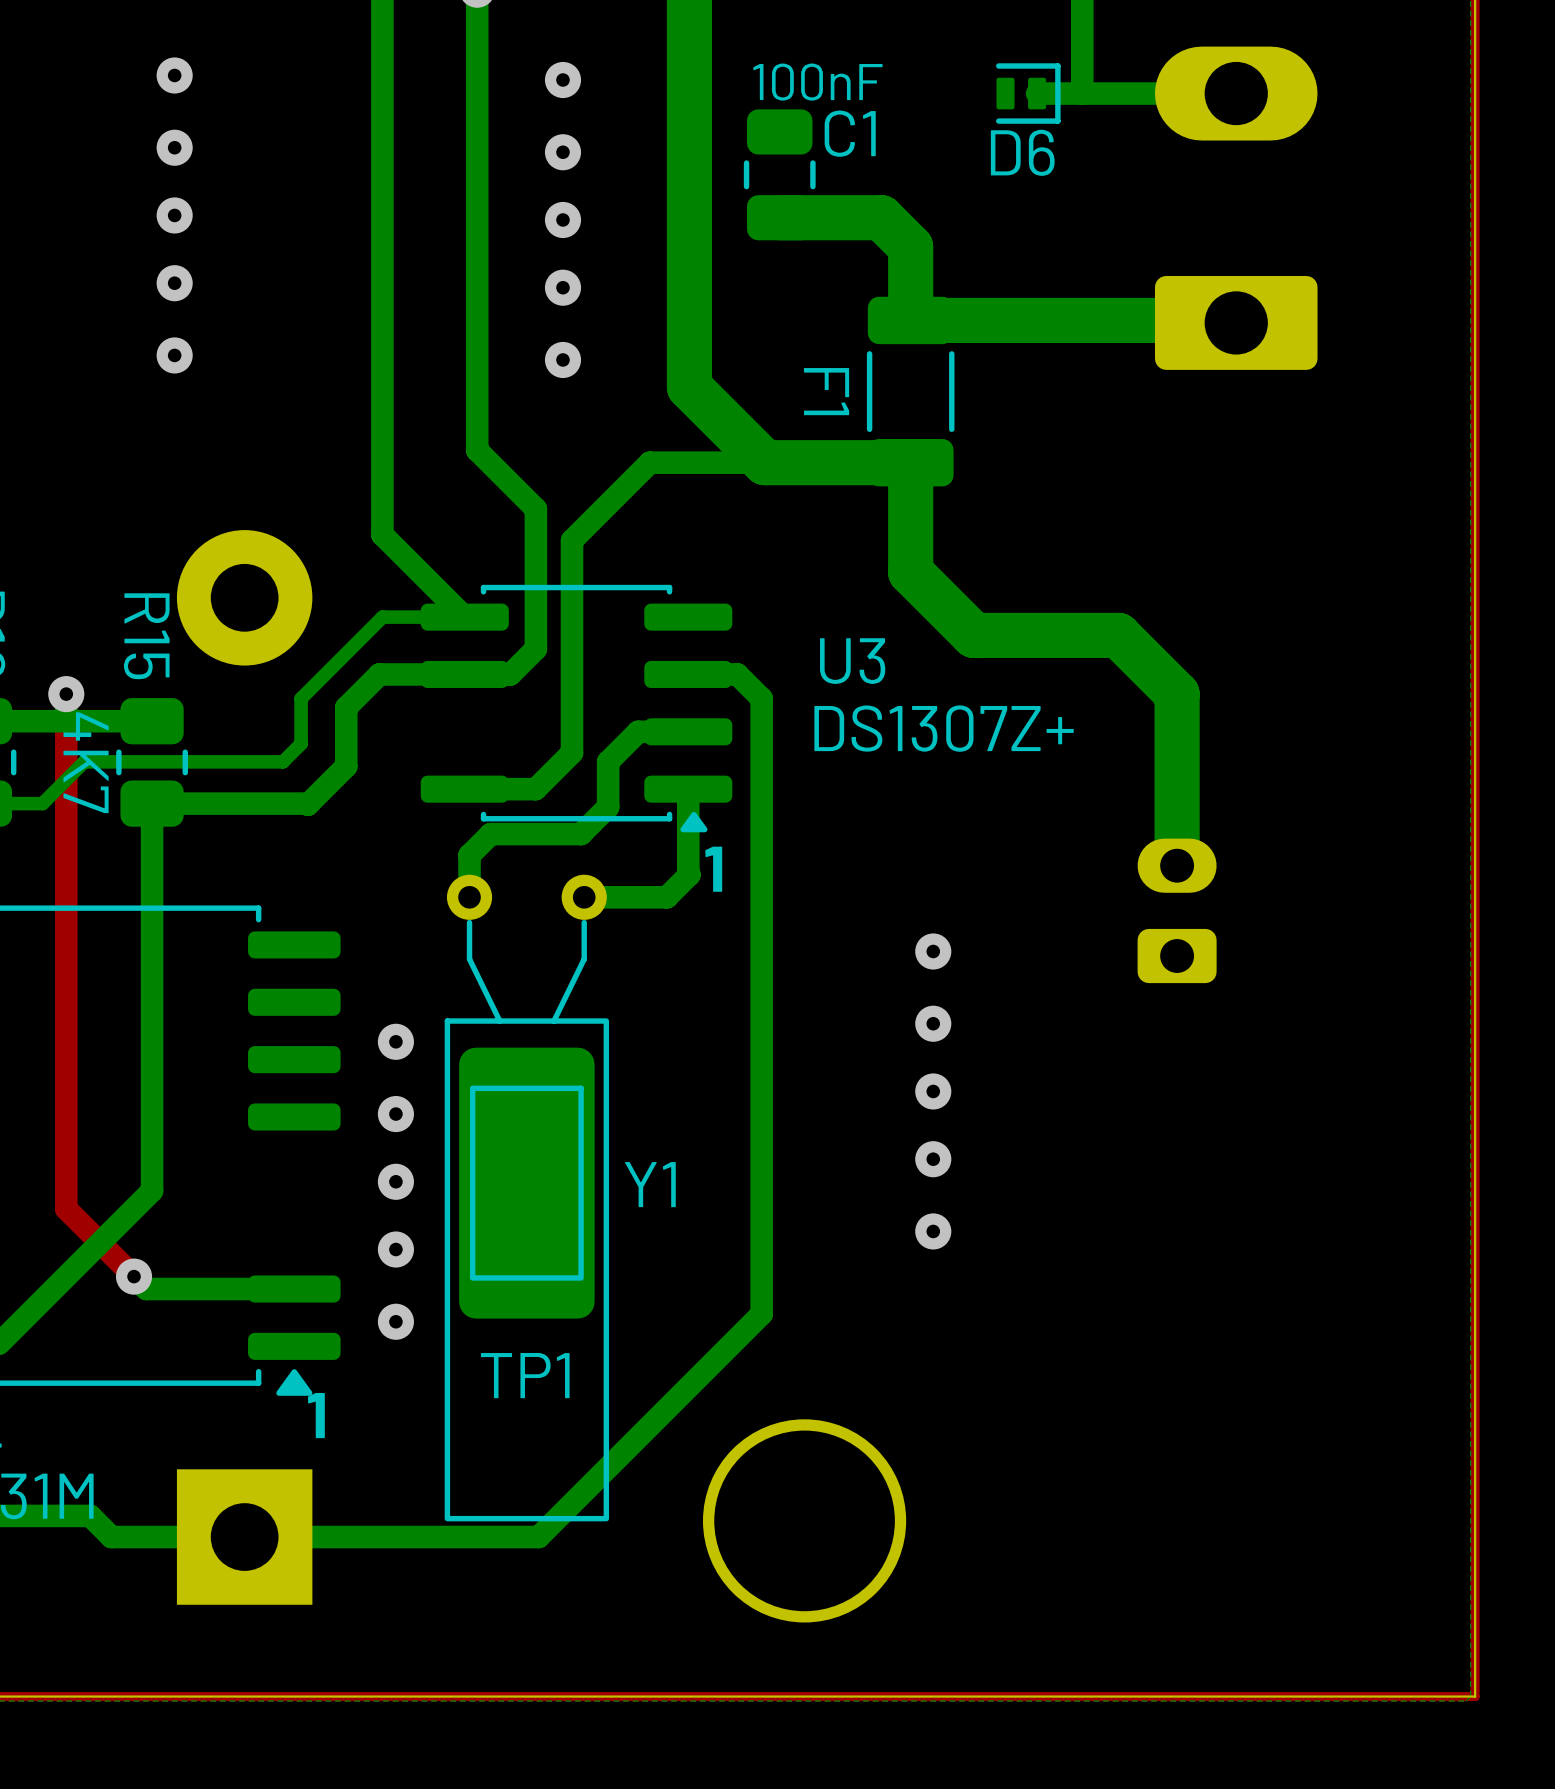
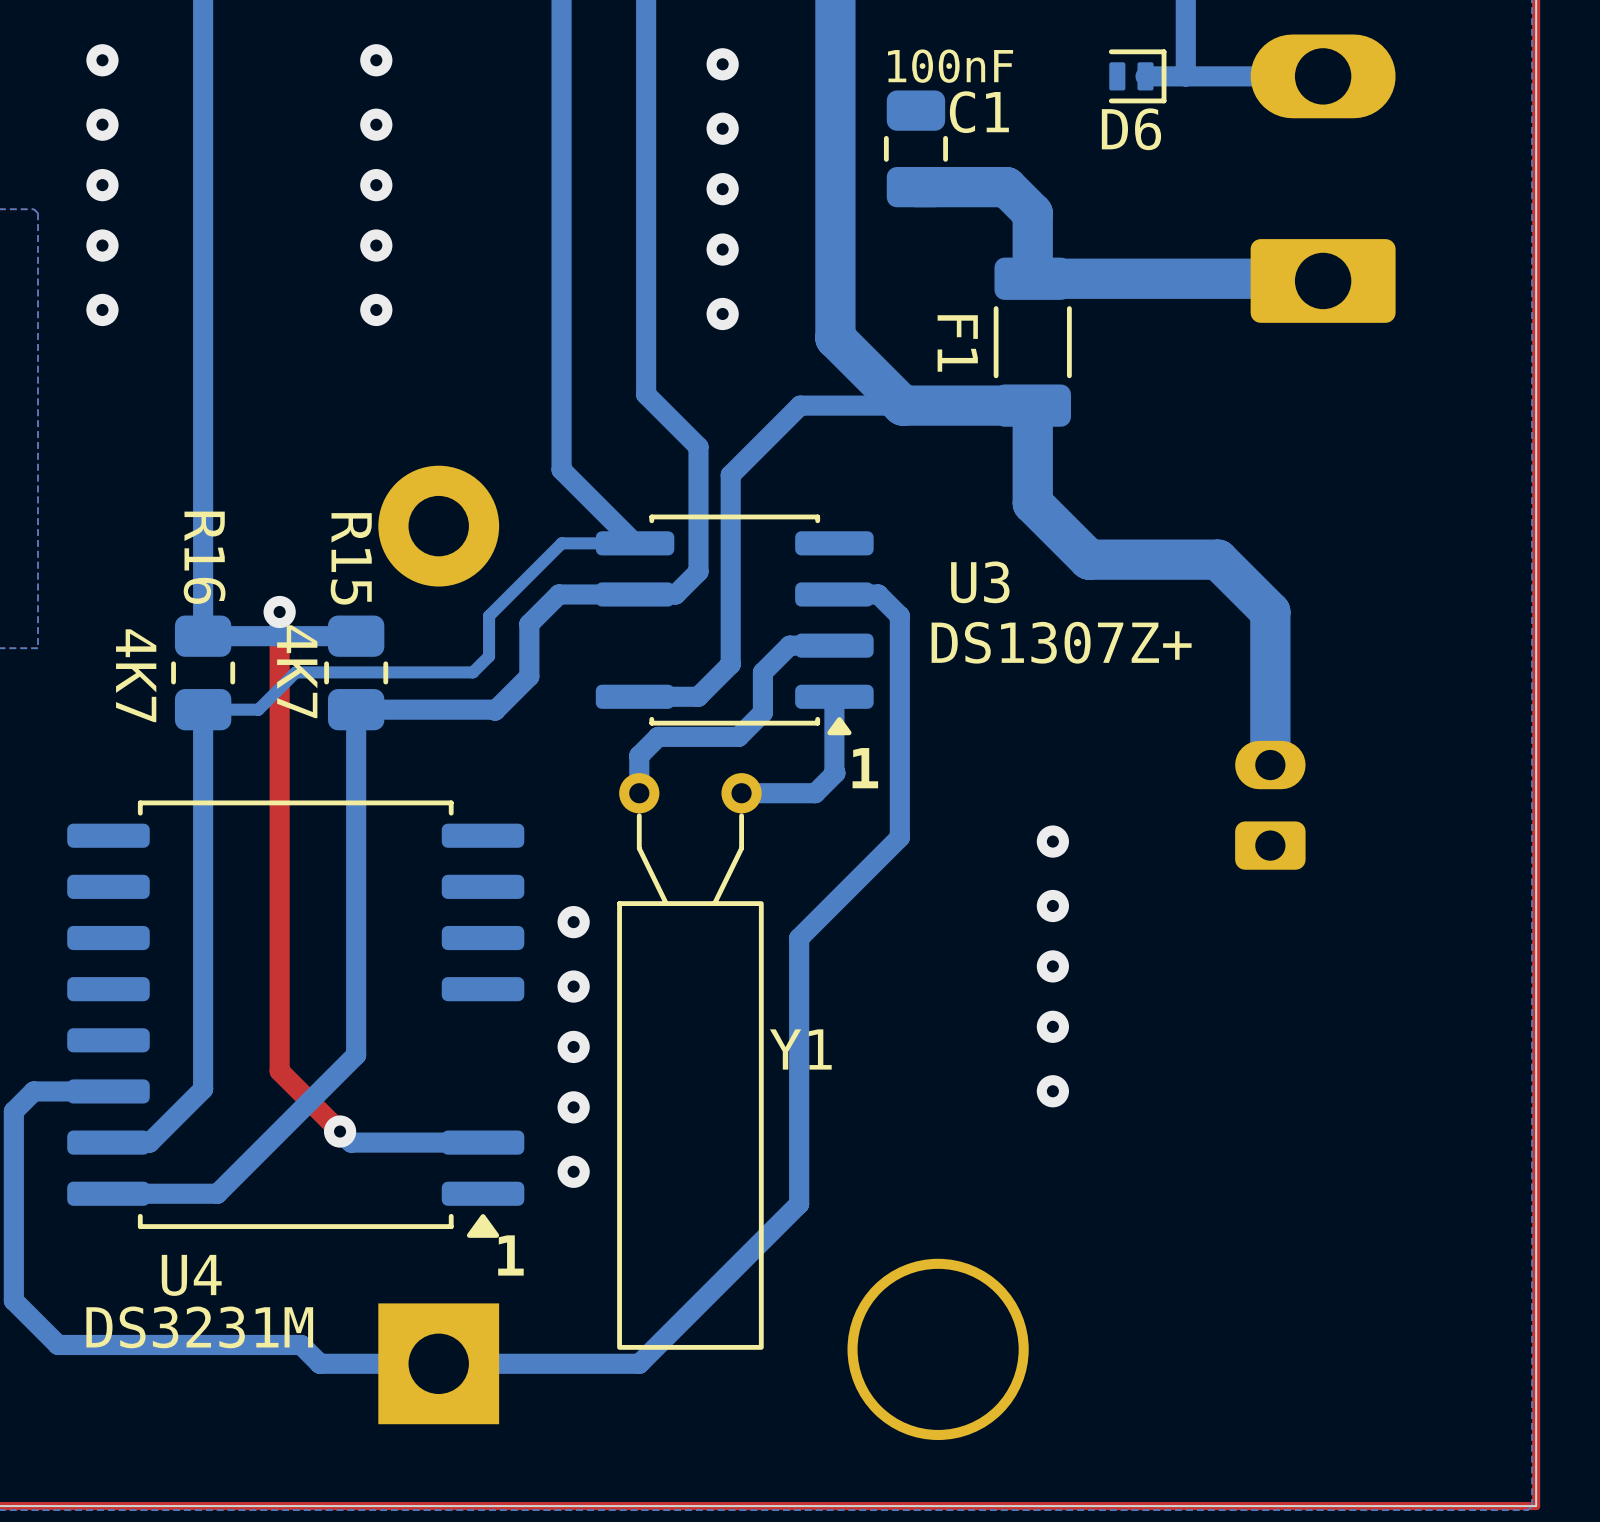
bottom track: (761, 946) (761, 1314) (538, 1537) (469, 1537) -> (899, 837) (799, 938) (799, 1204) (639, 1363)
TP1: (526, 1183) -> none

